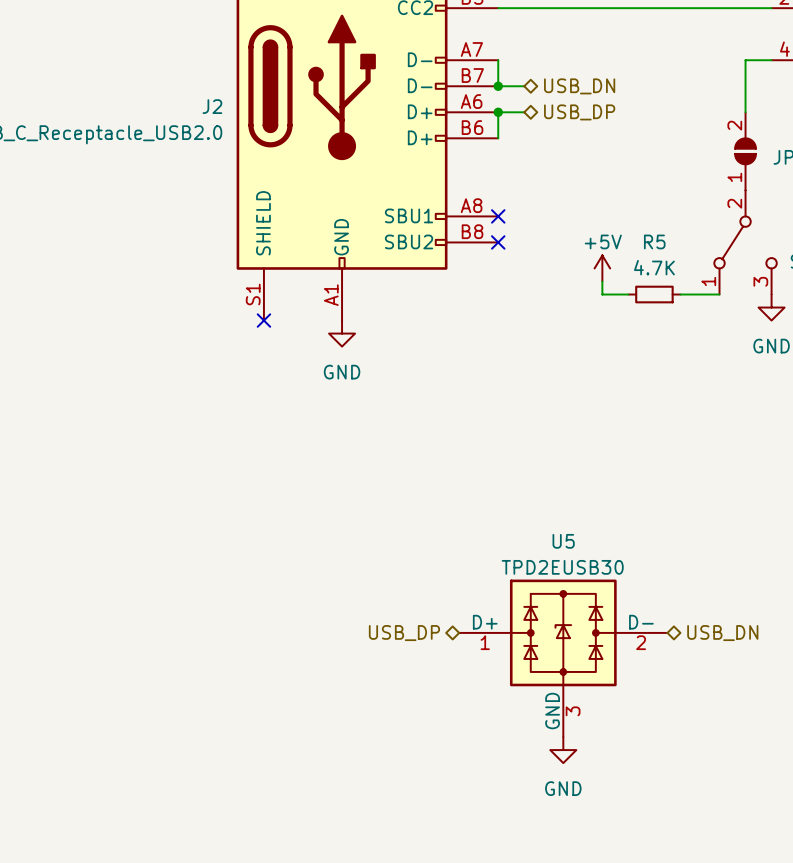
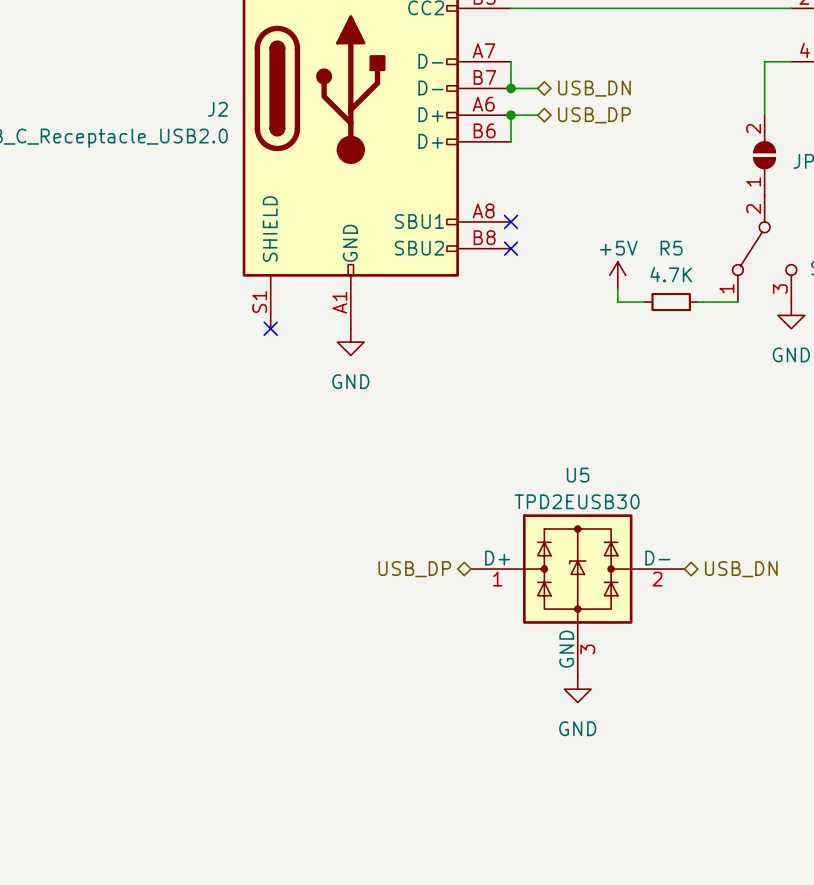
hierarchical label position: USB_DP (404, 633) -> USB_DP (414, 569)
hierarchical label position: USB_DN (722, 633) -> USB_DN (741, 569)
U5 position: (563, 658) -> (577, 595)
power symbol position: GND (563, 750) -> GND (577, 689)

